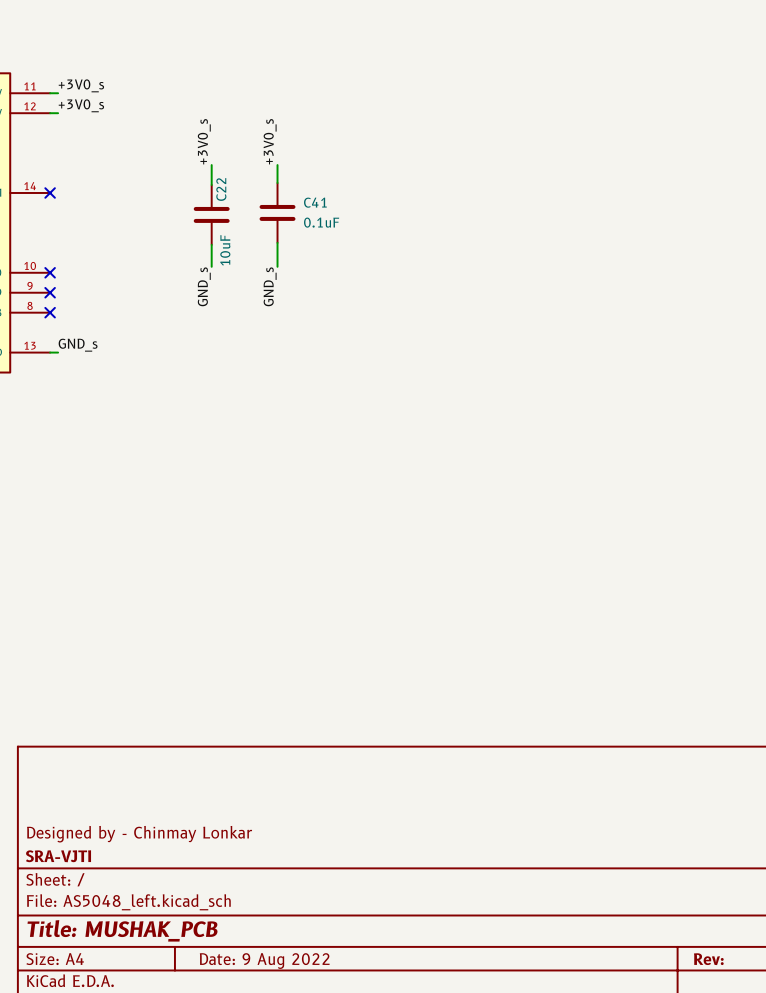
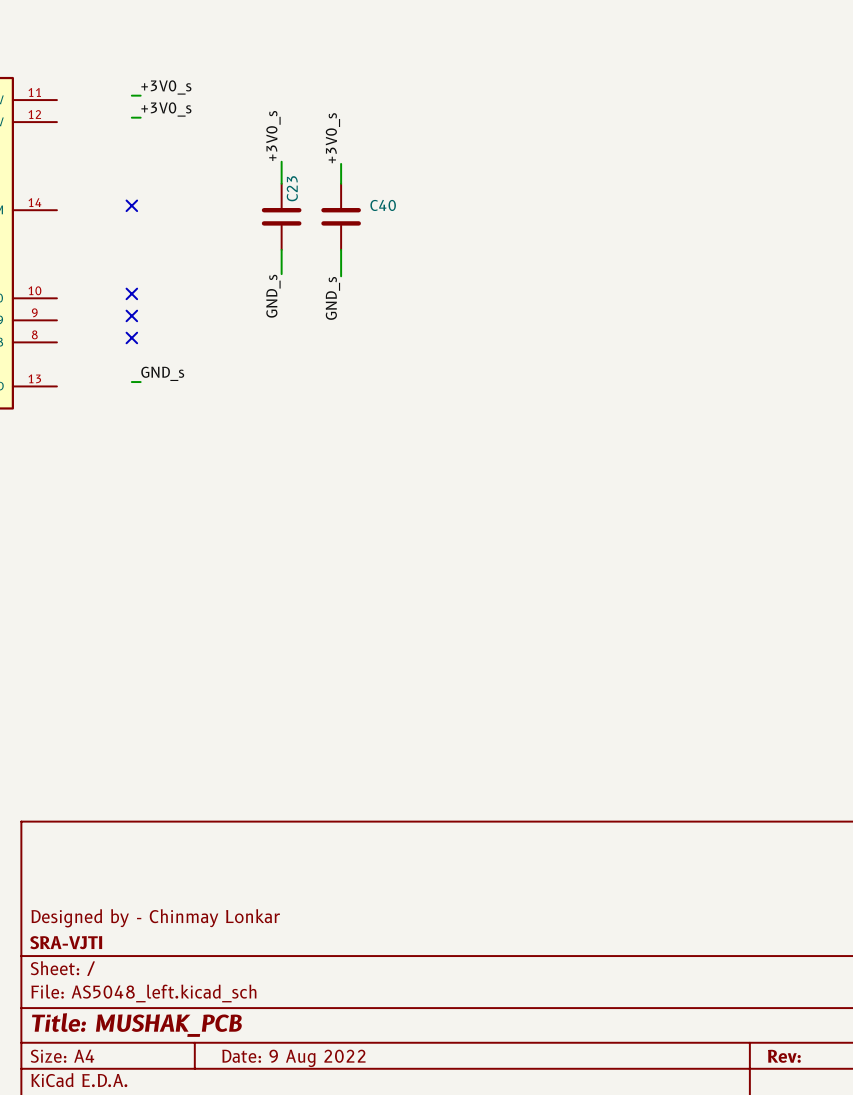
label: none -> +3V0_s (166, 87)
label: +3V0_s (81, 85) -> none
wire: (50, 93) (58, 93) -> (131, 95) (140, 95)
label: none -> +3V0_s (166, 109)
label: +3V0_s (81, 105) -> none
wire: (50, 113) (58, 113) -> (131, 117) (140, 117)
label: none -> +3V0_s (273, 136)
label: none -> +3V0_s (332, 138)
label: +3V0_s (204, 141) -> none
label: +3V0_s (270, 141) -> none
wire: (211, 165) (211, 185) -> (281, 161) (281, 183)
wire: (277, 165) (277, 183) -> (341, 163) (341, 183)
no-connect mark: none -> (131, 205)
no-connect mark: (50, 192) -> none
C23: none -> (281, 216)
C40: none -> (341, 216)
C41: 0.1uF (277, 212) -> none
C22: 10uF (211, 214) -> none
wire: (277, 242) (277, 266) -> (341, 249) (341, 276)
wire: (211, 244) (211, 266) -> (281, 249) (281, 274)
no-connect mark: none -> (131, 293)
label: none -> GND_s (273, 296)
no-connect mark: (50, 272) -> none
label: none -> GND_s (332, 298)
label: GND_s (204, 286) -> none
label: GND_s (270, 286) -> none
no-connect mark: none -> (131, 315)
no-connect mark: (50, 292) -> none
no-connect mark: none -> (131, 337)
no-connect mark: (50, 312) -> none
label: none -> GND_s (162, 373)
label: GND_s (78, 345) -> none
wire: (50, 352) (58, 352) -> (131, 382) (140, 382)

